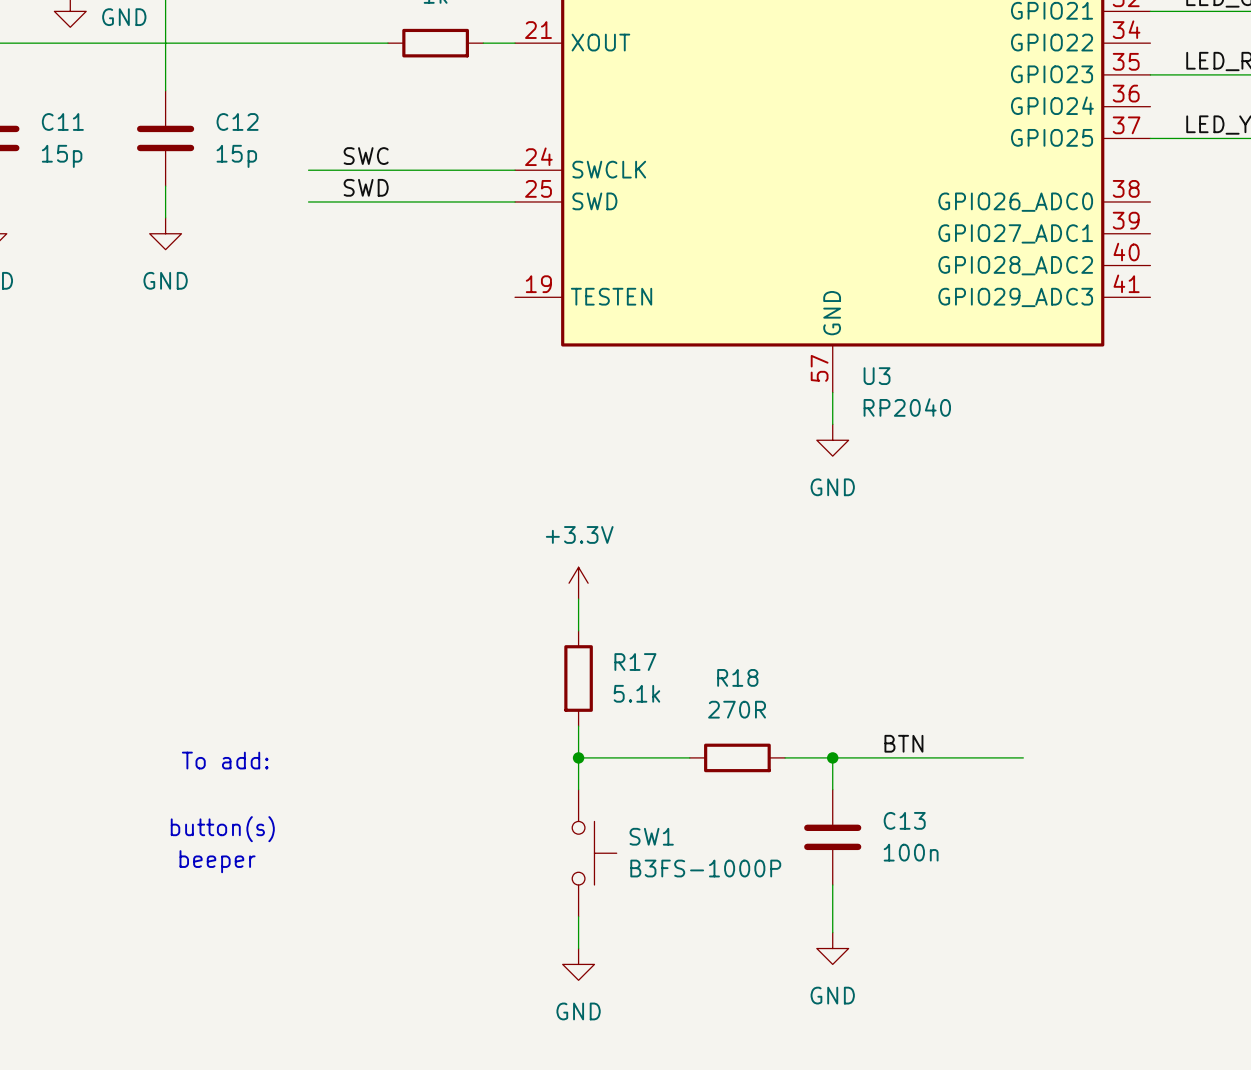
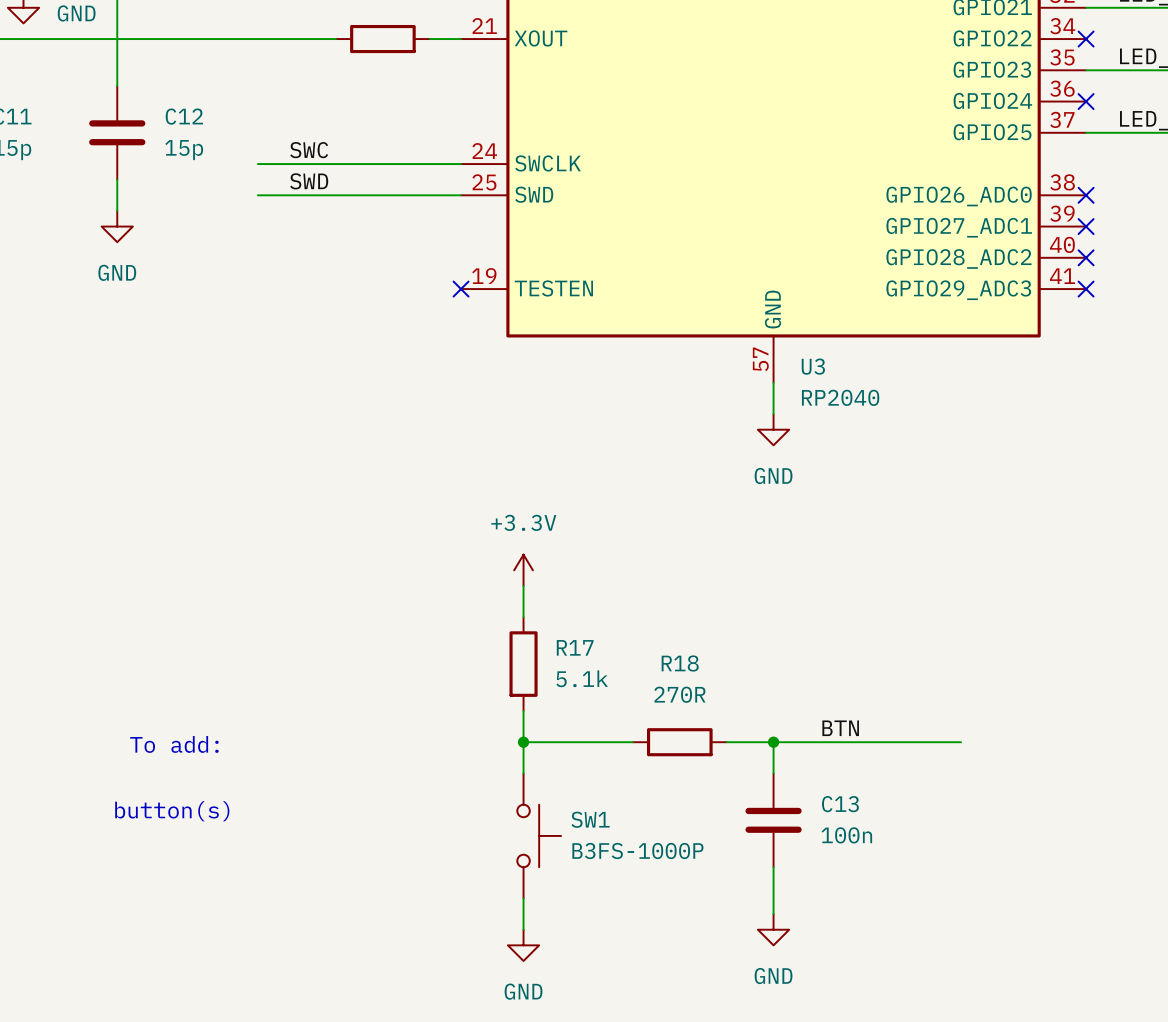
no-connect mark: none -> (1086, 39)
no-connect mark: none -> (1086, 101)
no-connect mark: none -> (1086, 195)
no-connect mark: none -> (1086, 226)
no-connect mark: none -> (1086, 257)
no-connect mark: none -> (461, 289)
no-connect mark: none -> (1086, 289)
text: beeper (217, 861) -> none

